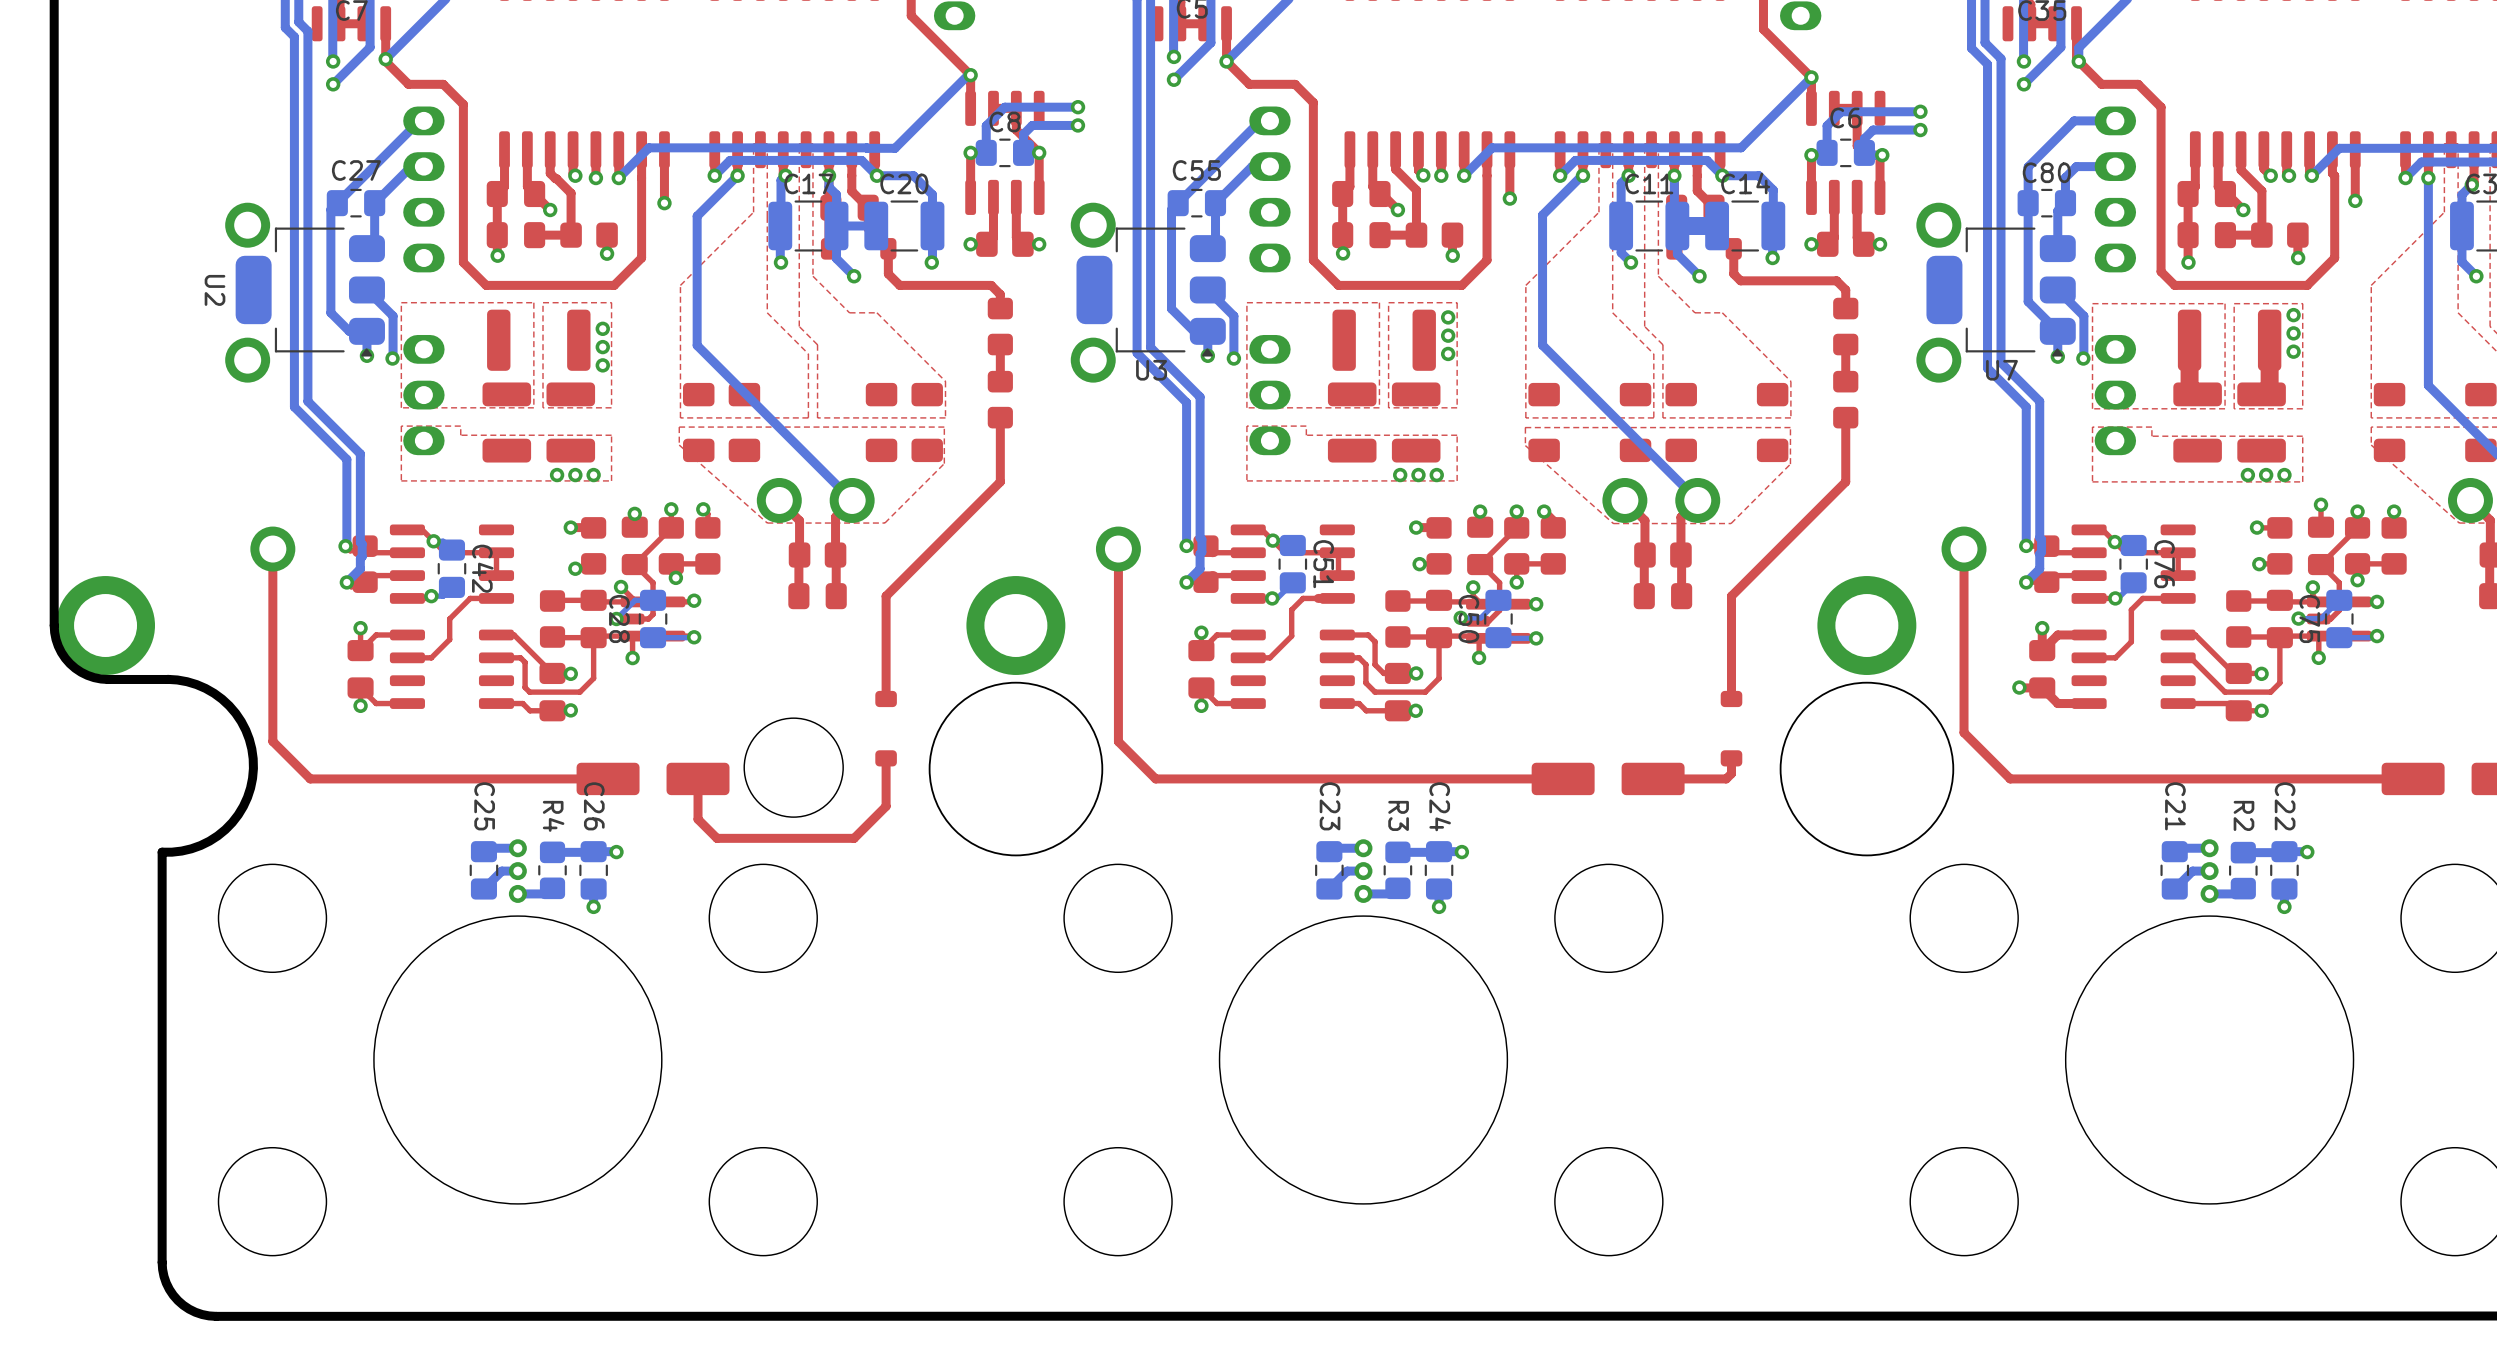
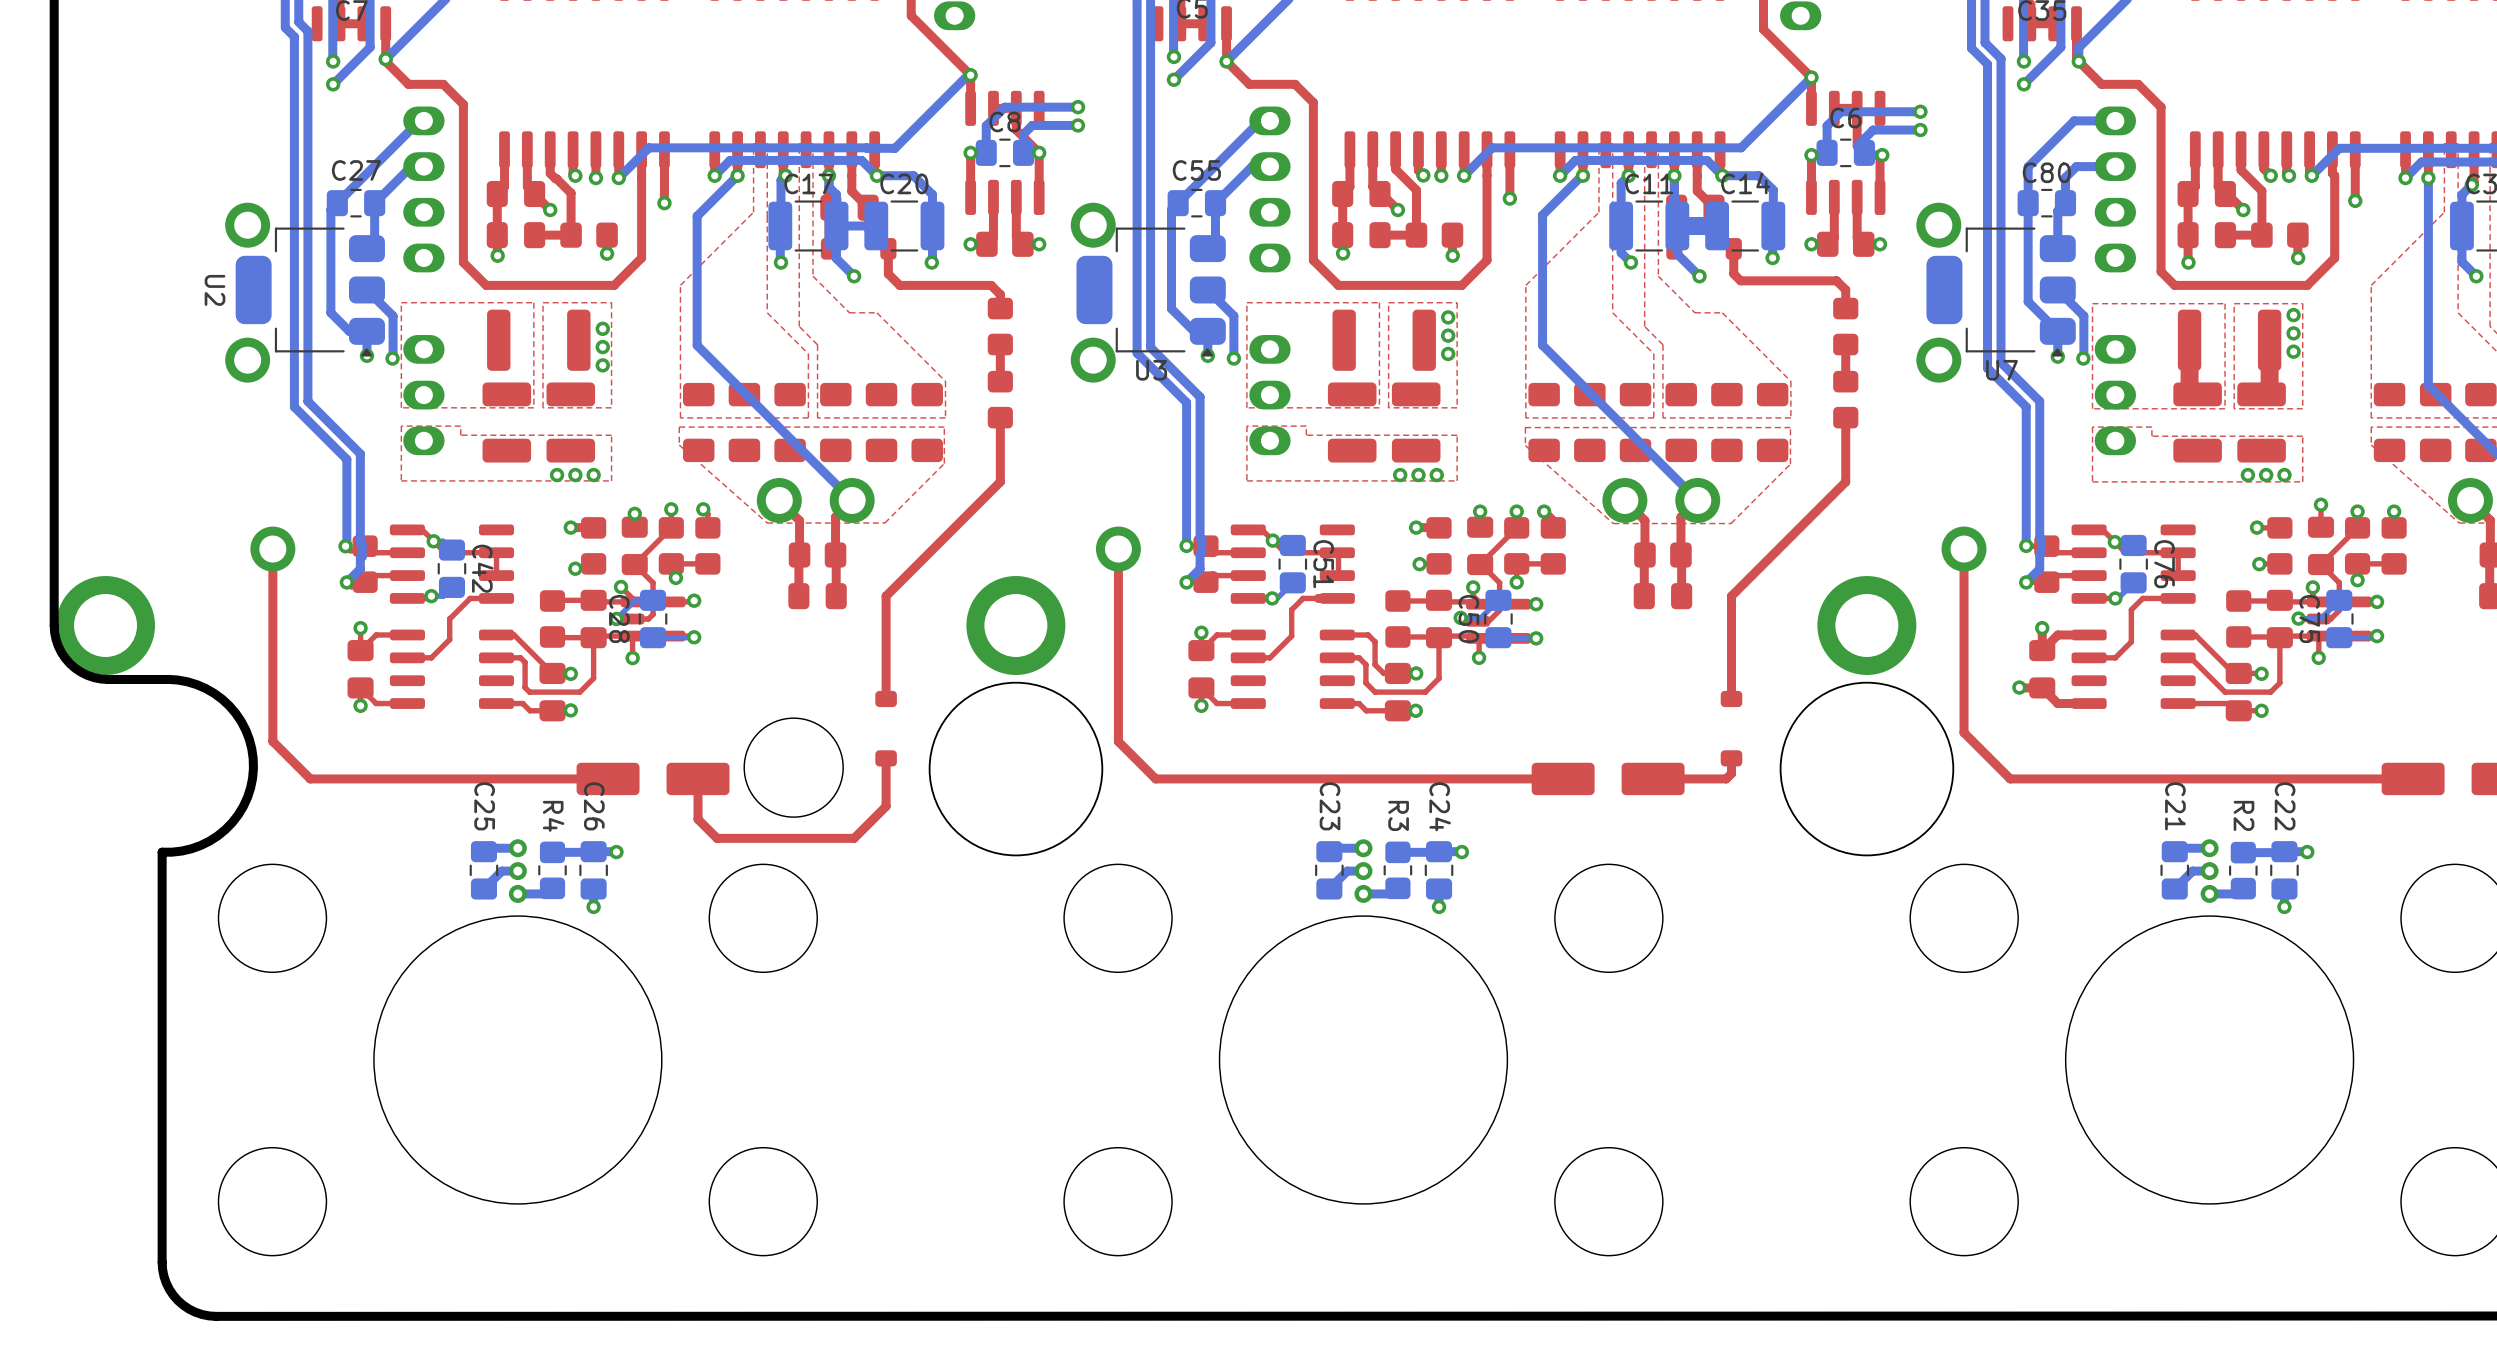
part: none -> (790, 422)
part: none -> (835, 422)
part: none -> (1589, 422)
part: none -> (1726, 422)
part: none -> (2435, 422)

